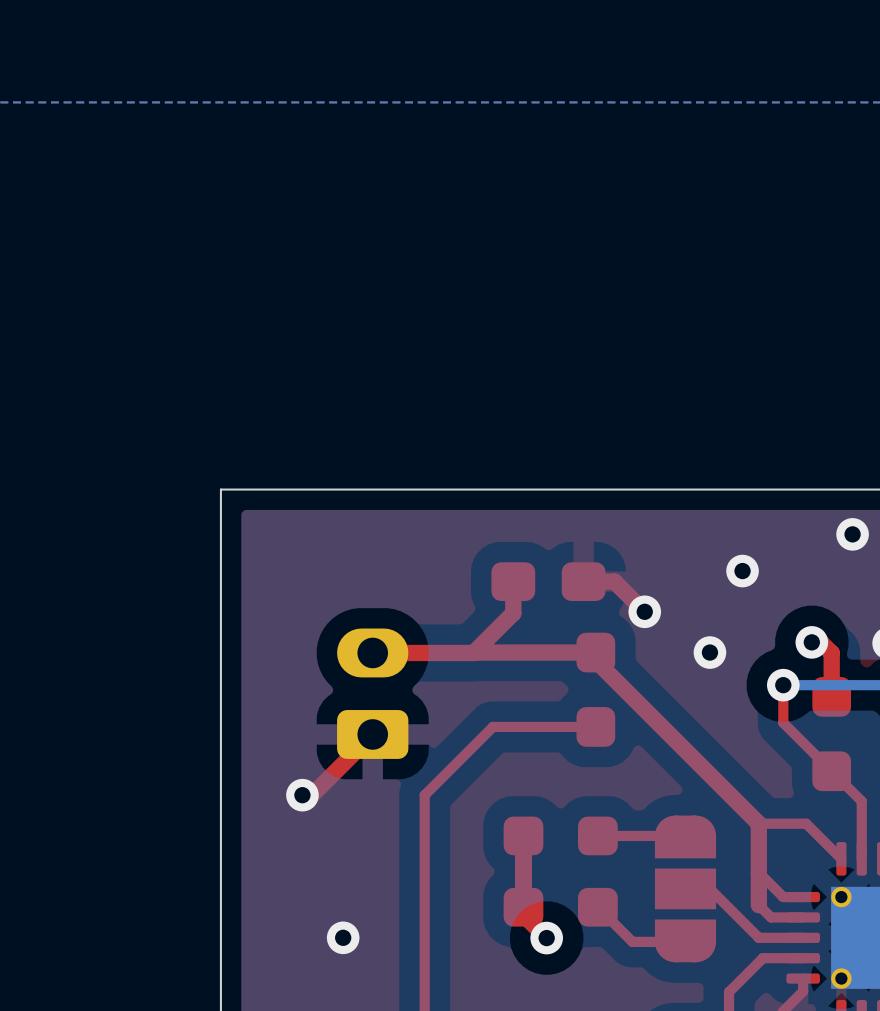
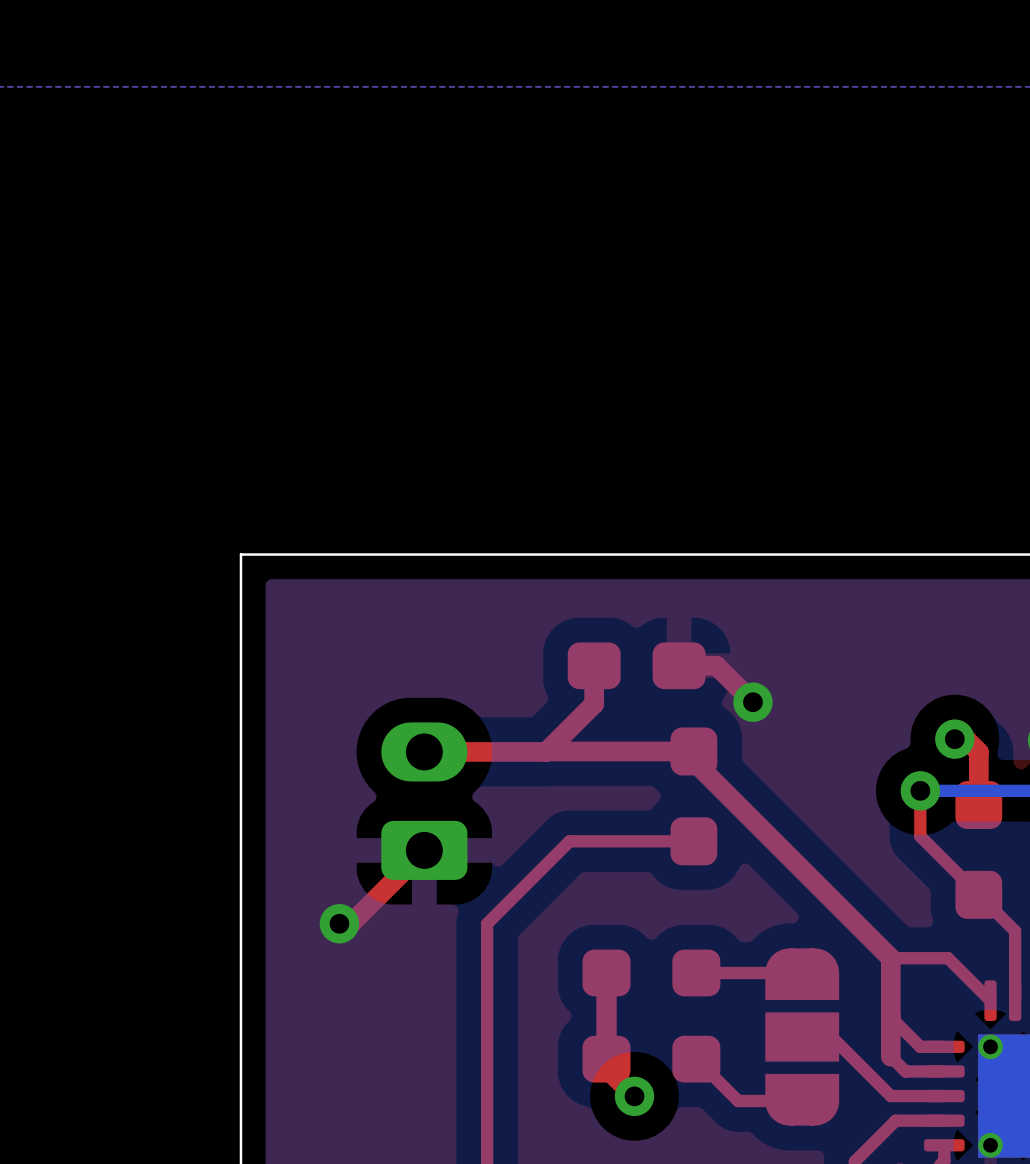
via: (852, 534) -> none
via: (742, 571) -> none
via: (709, 652) -> none
via: (343, 937) -> none

